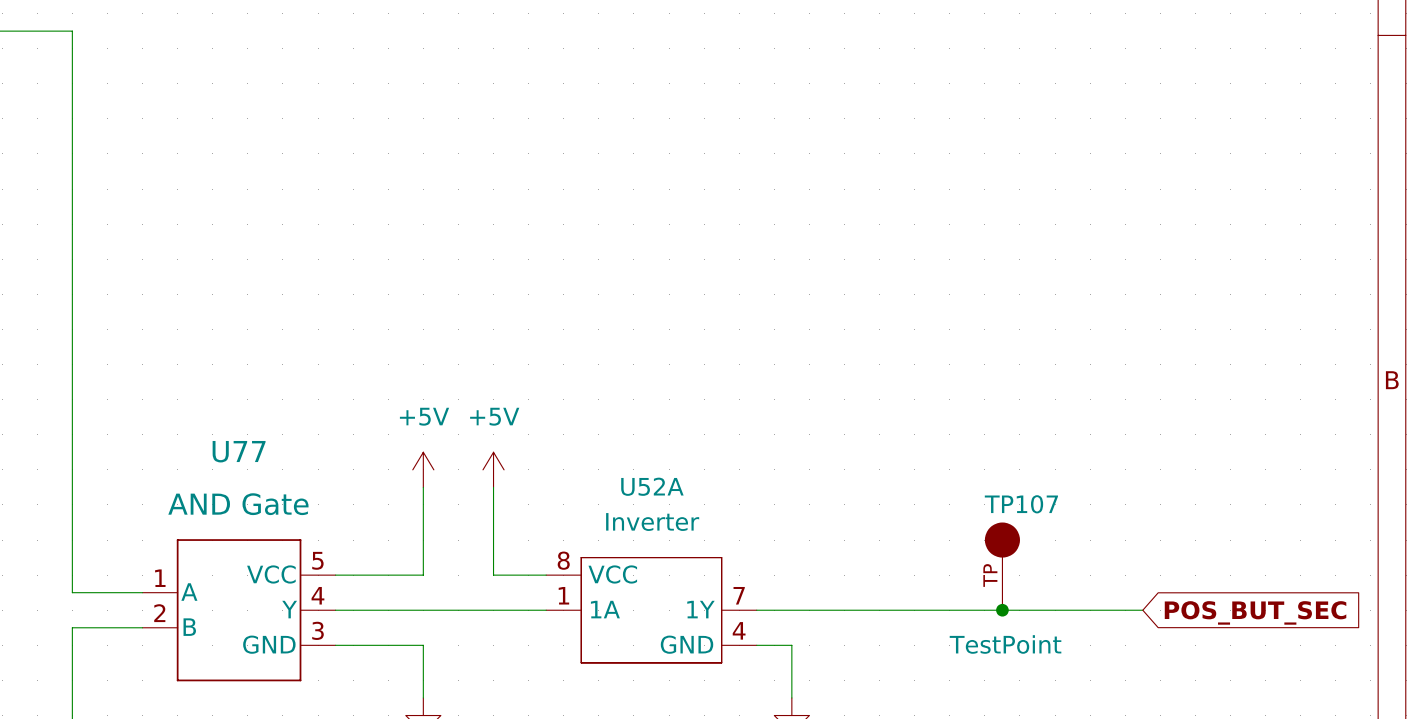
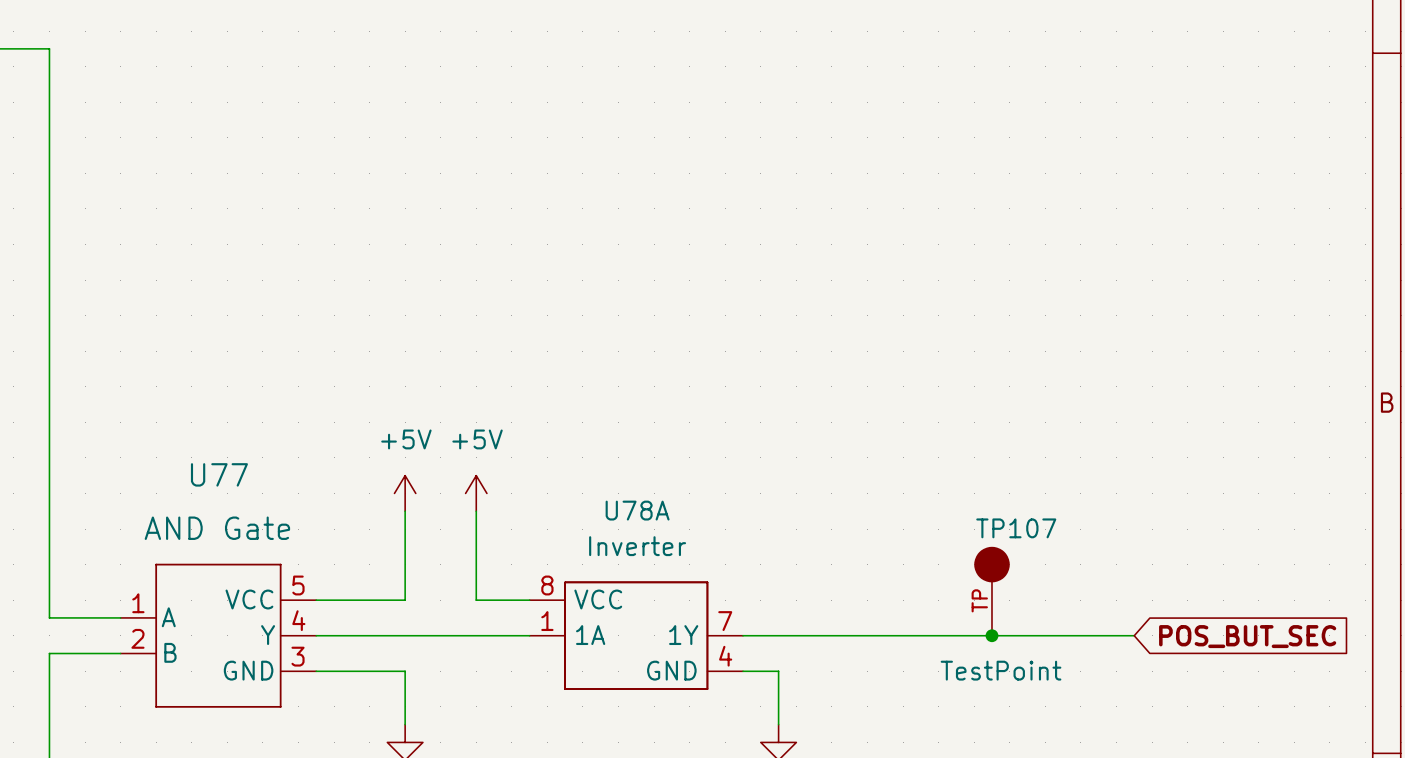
U52A name: U52A (652, 486) -> U78A (637, 510)

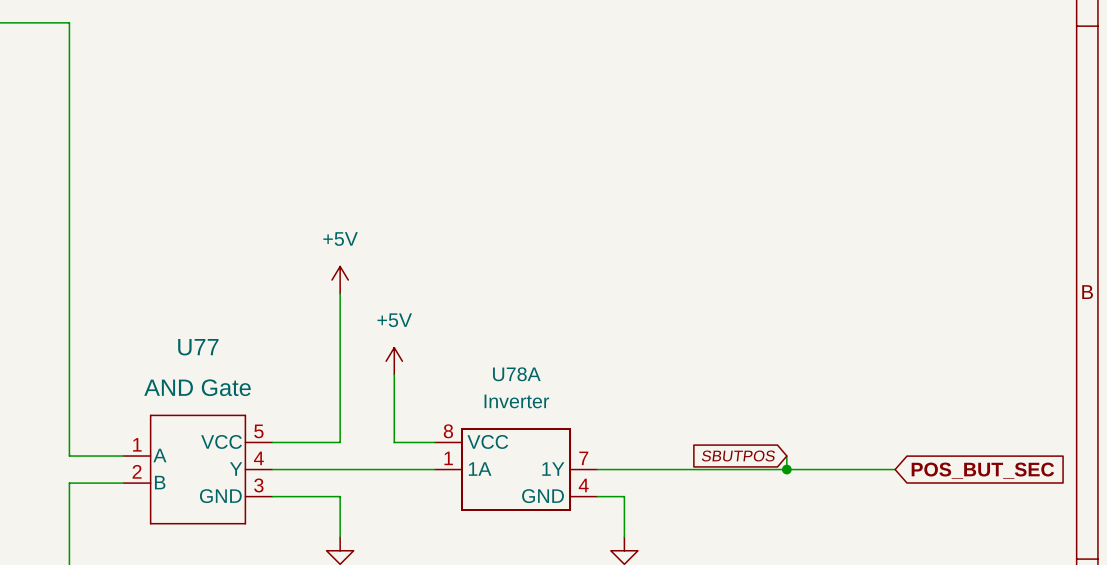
wire: none -> (340, 293) (340, 374)
power symbol position: +5V (405, 493) -> +5V (340, 280)
TP107: TestPoint (991, 591) -> none
global label: none -> SBUTPOS (738, 456)

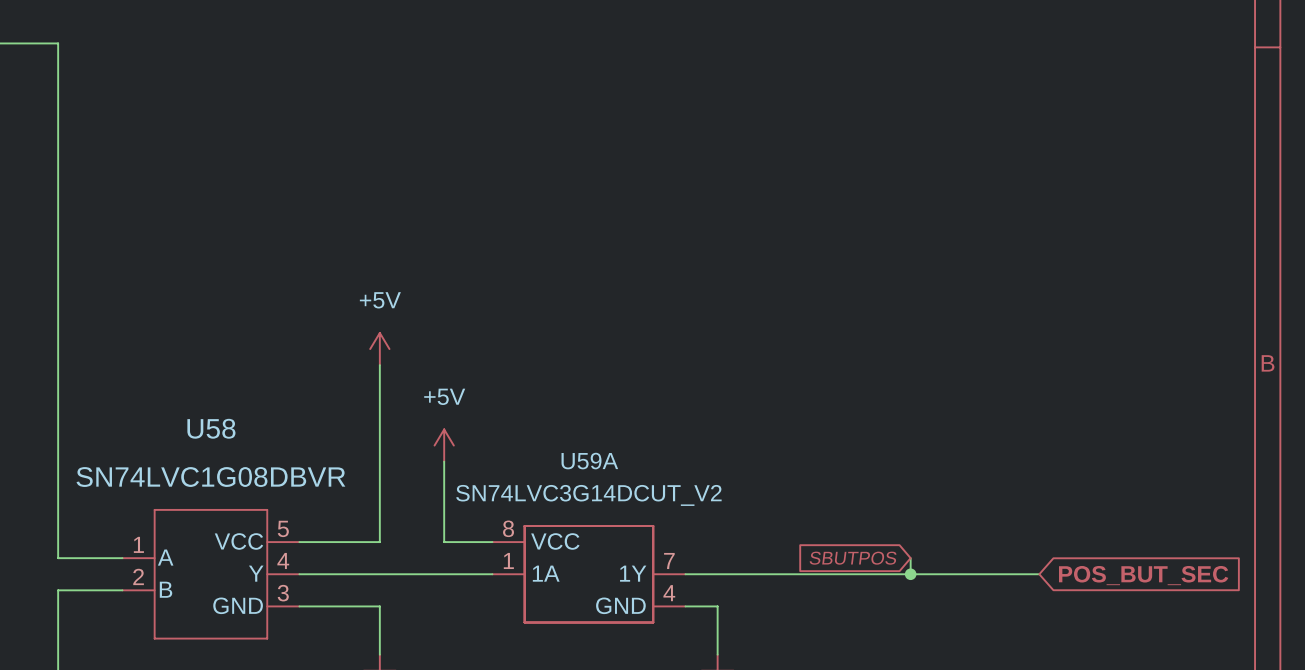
U77 name: U77 (198, 347) -> U58 (211, 428)
U78A name: U78A (516, 374) -> U59A (589, 461)
U77 value: AND Gate (197, 387) -> SN74LVC1G08DBVR (210, 477)
U78A value: Inverter (516, 401) -> SN74LVC3G14DCUT_V2 (588, 495)

